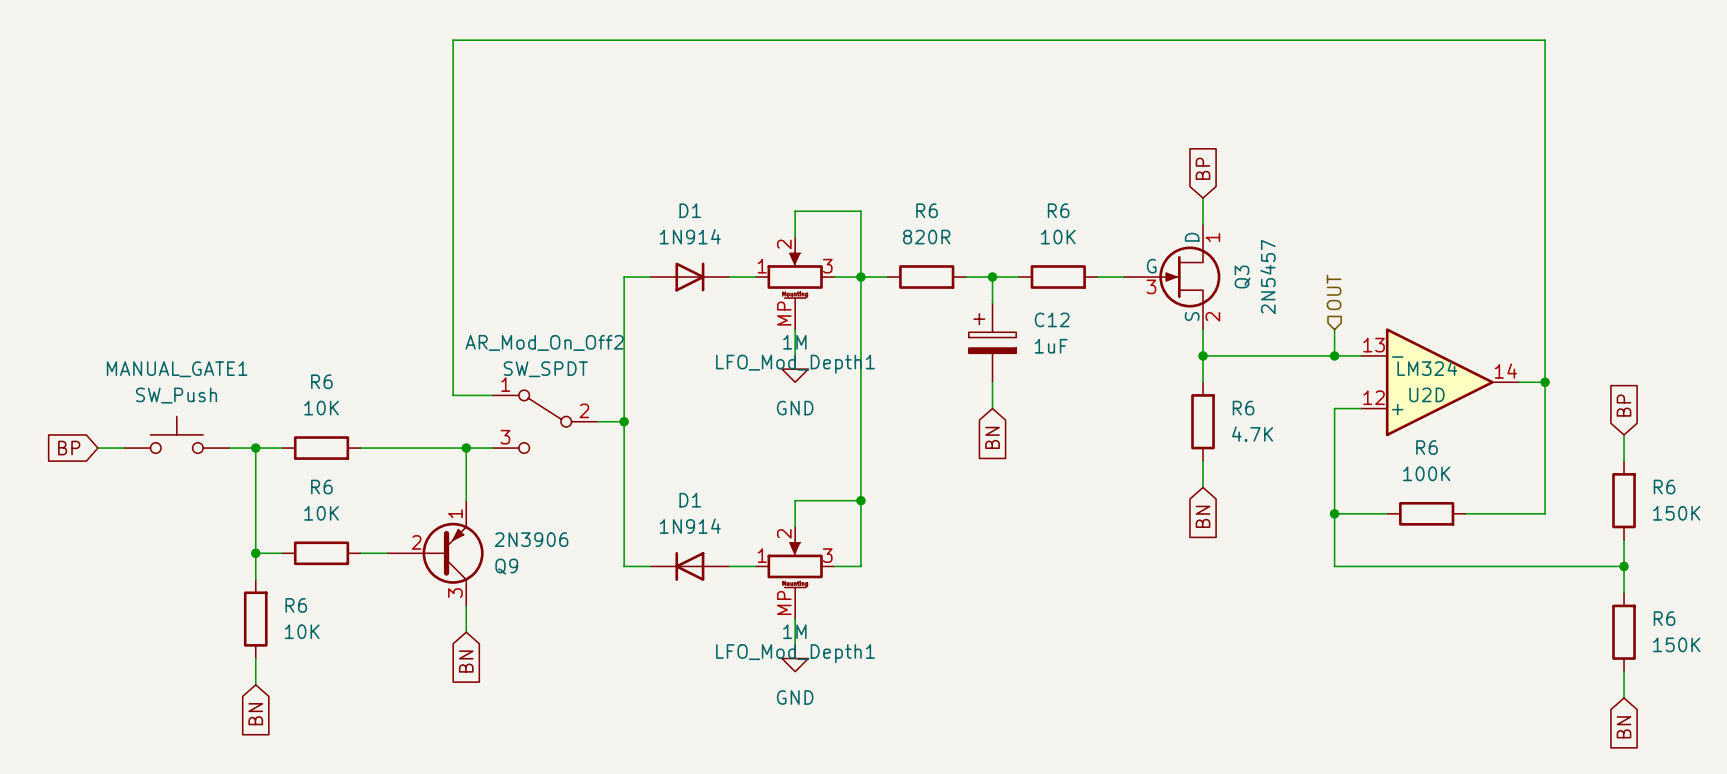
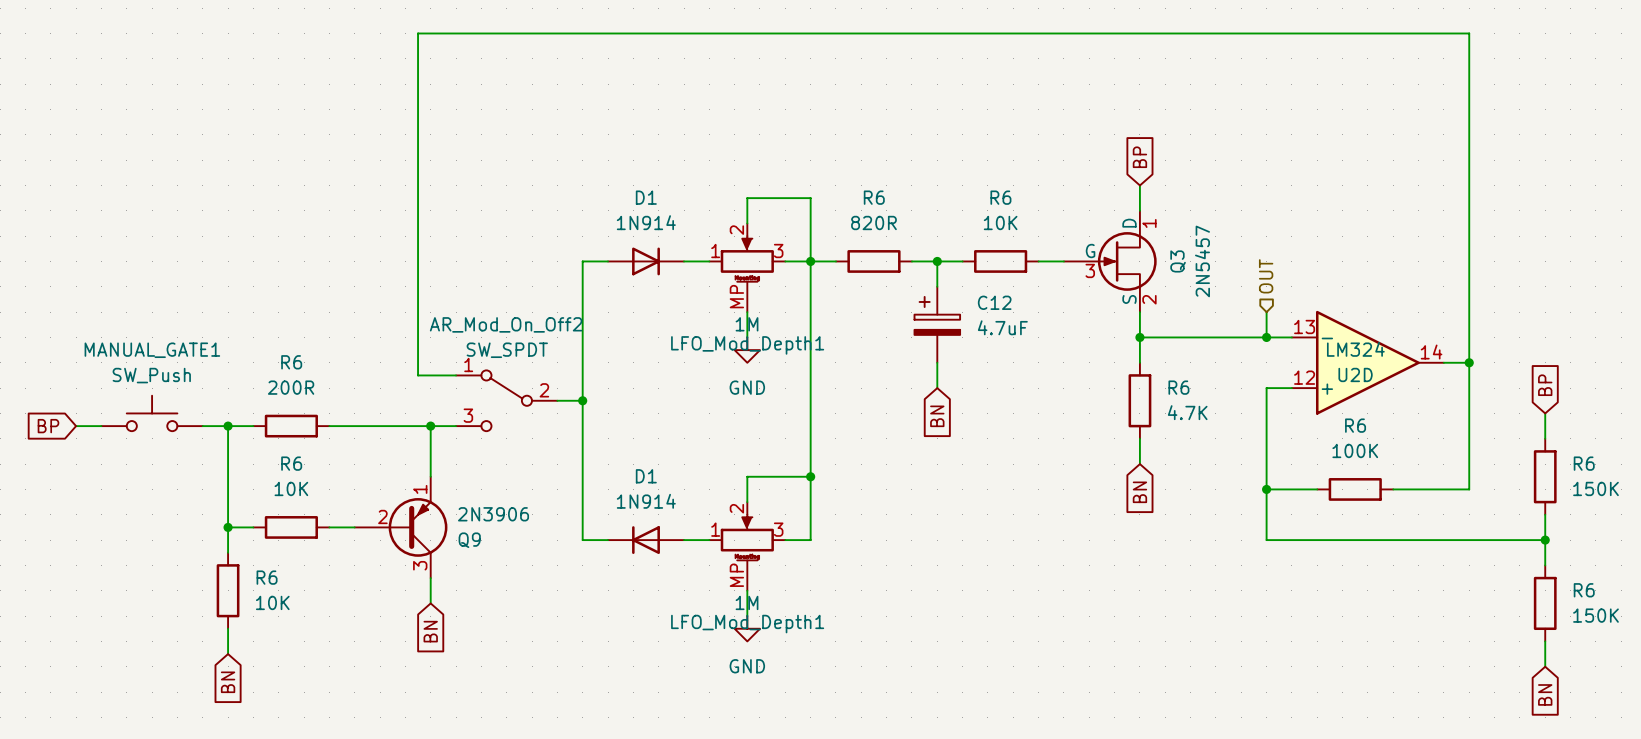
C12 value: 1uF (1051, 346) -> 4.7uF (1002, 327)
R6 value: 10K (321, 408) -> 200R (291, 387)

